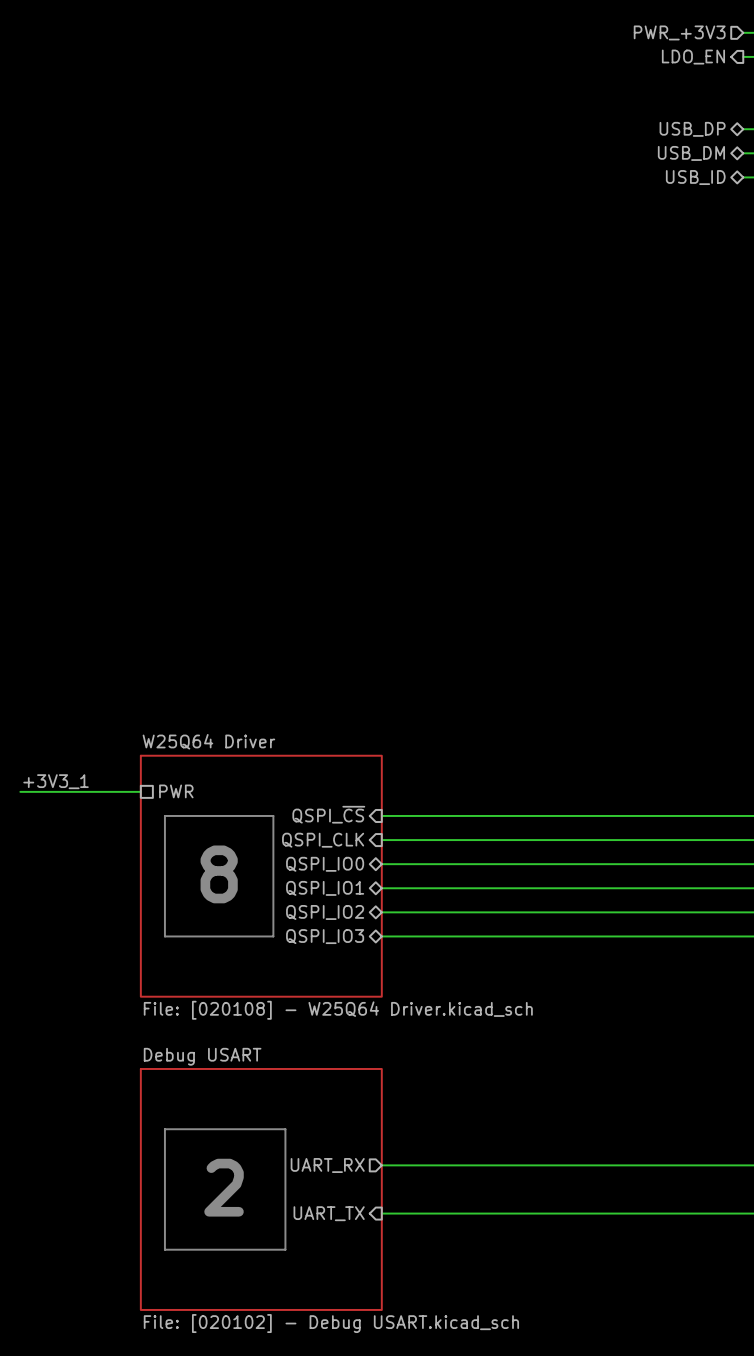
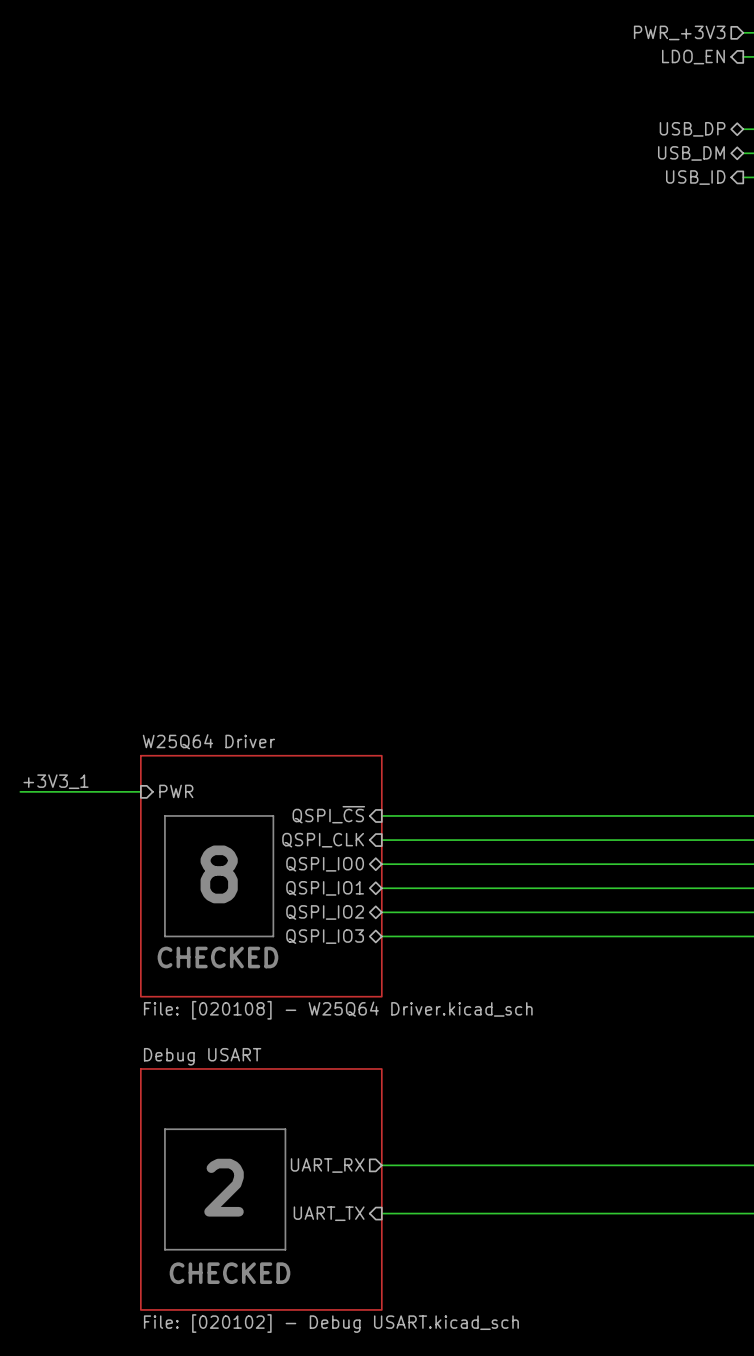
hierarchical label shape: bidirectional (695, 177) -> output (695, 177)
sheet pin shape: passive (176, 791) -> input (176, 791)
text: none -> CHECKED (217, 957)
text: none -> CHECKED (230, 1273)

